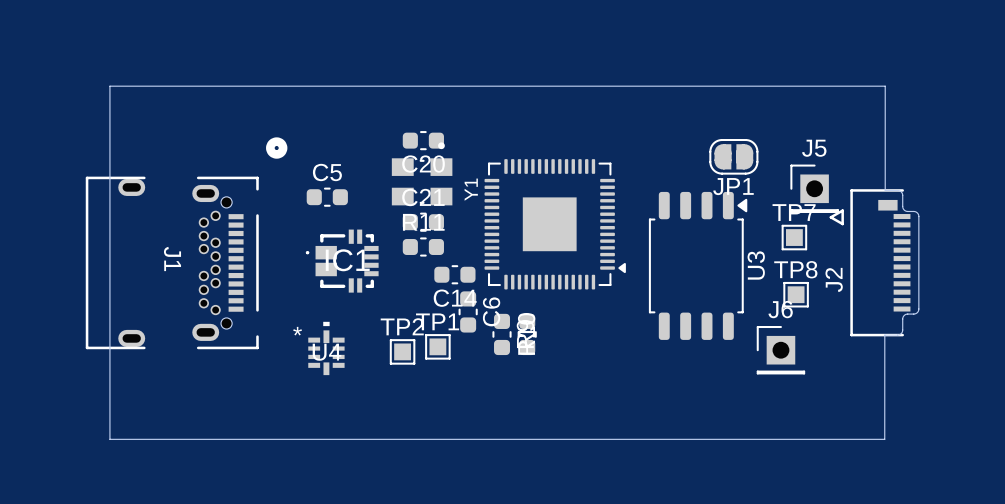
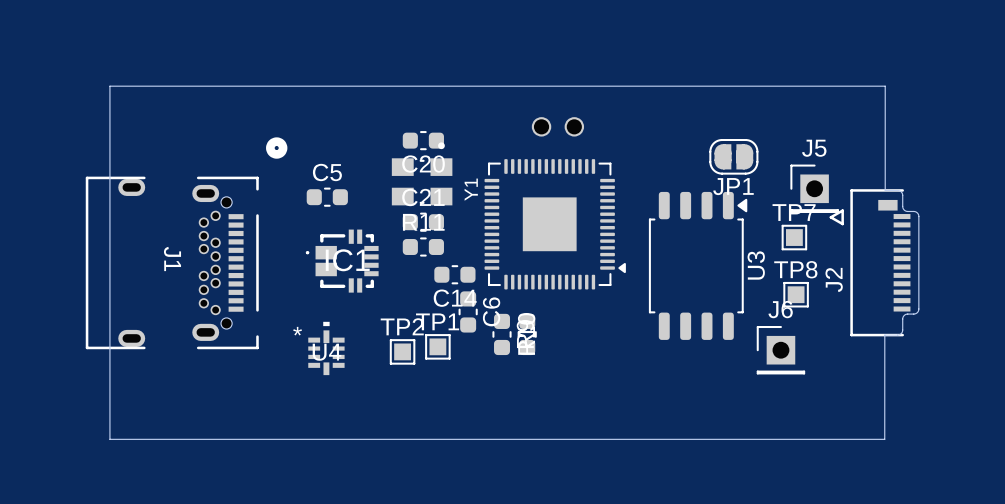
part: none -> (557, 126)

